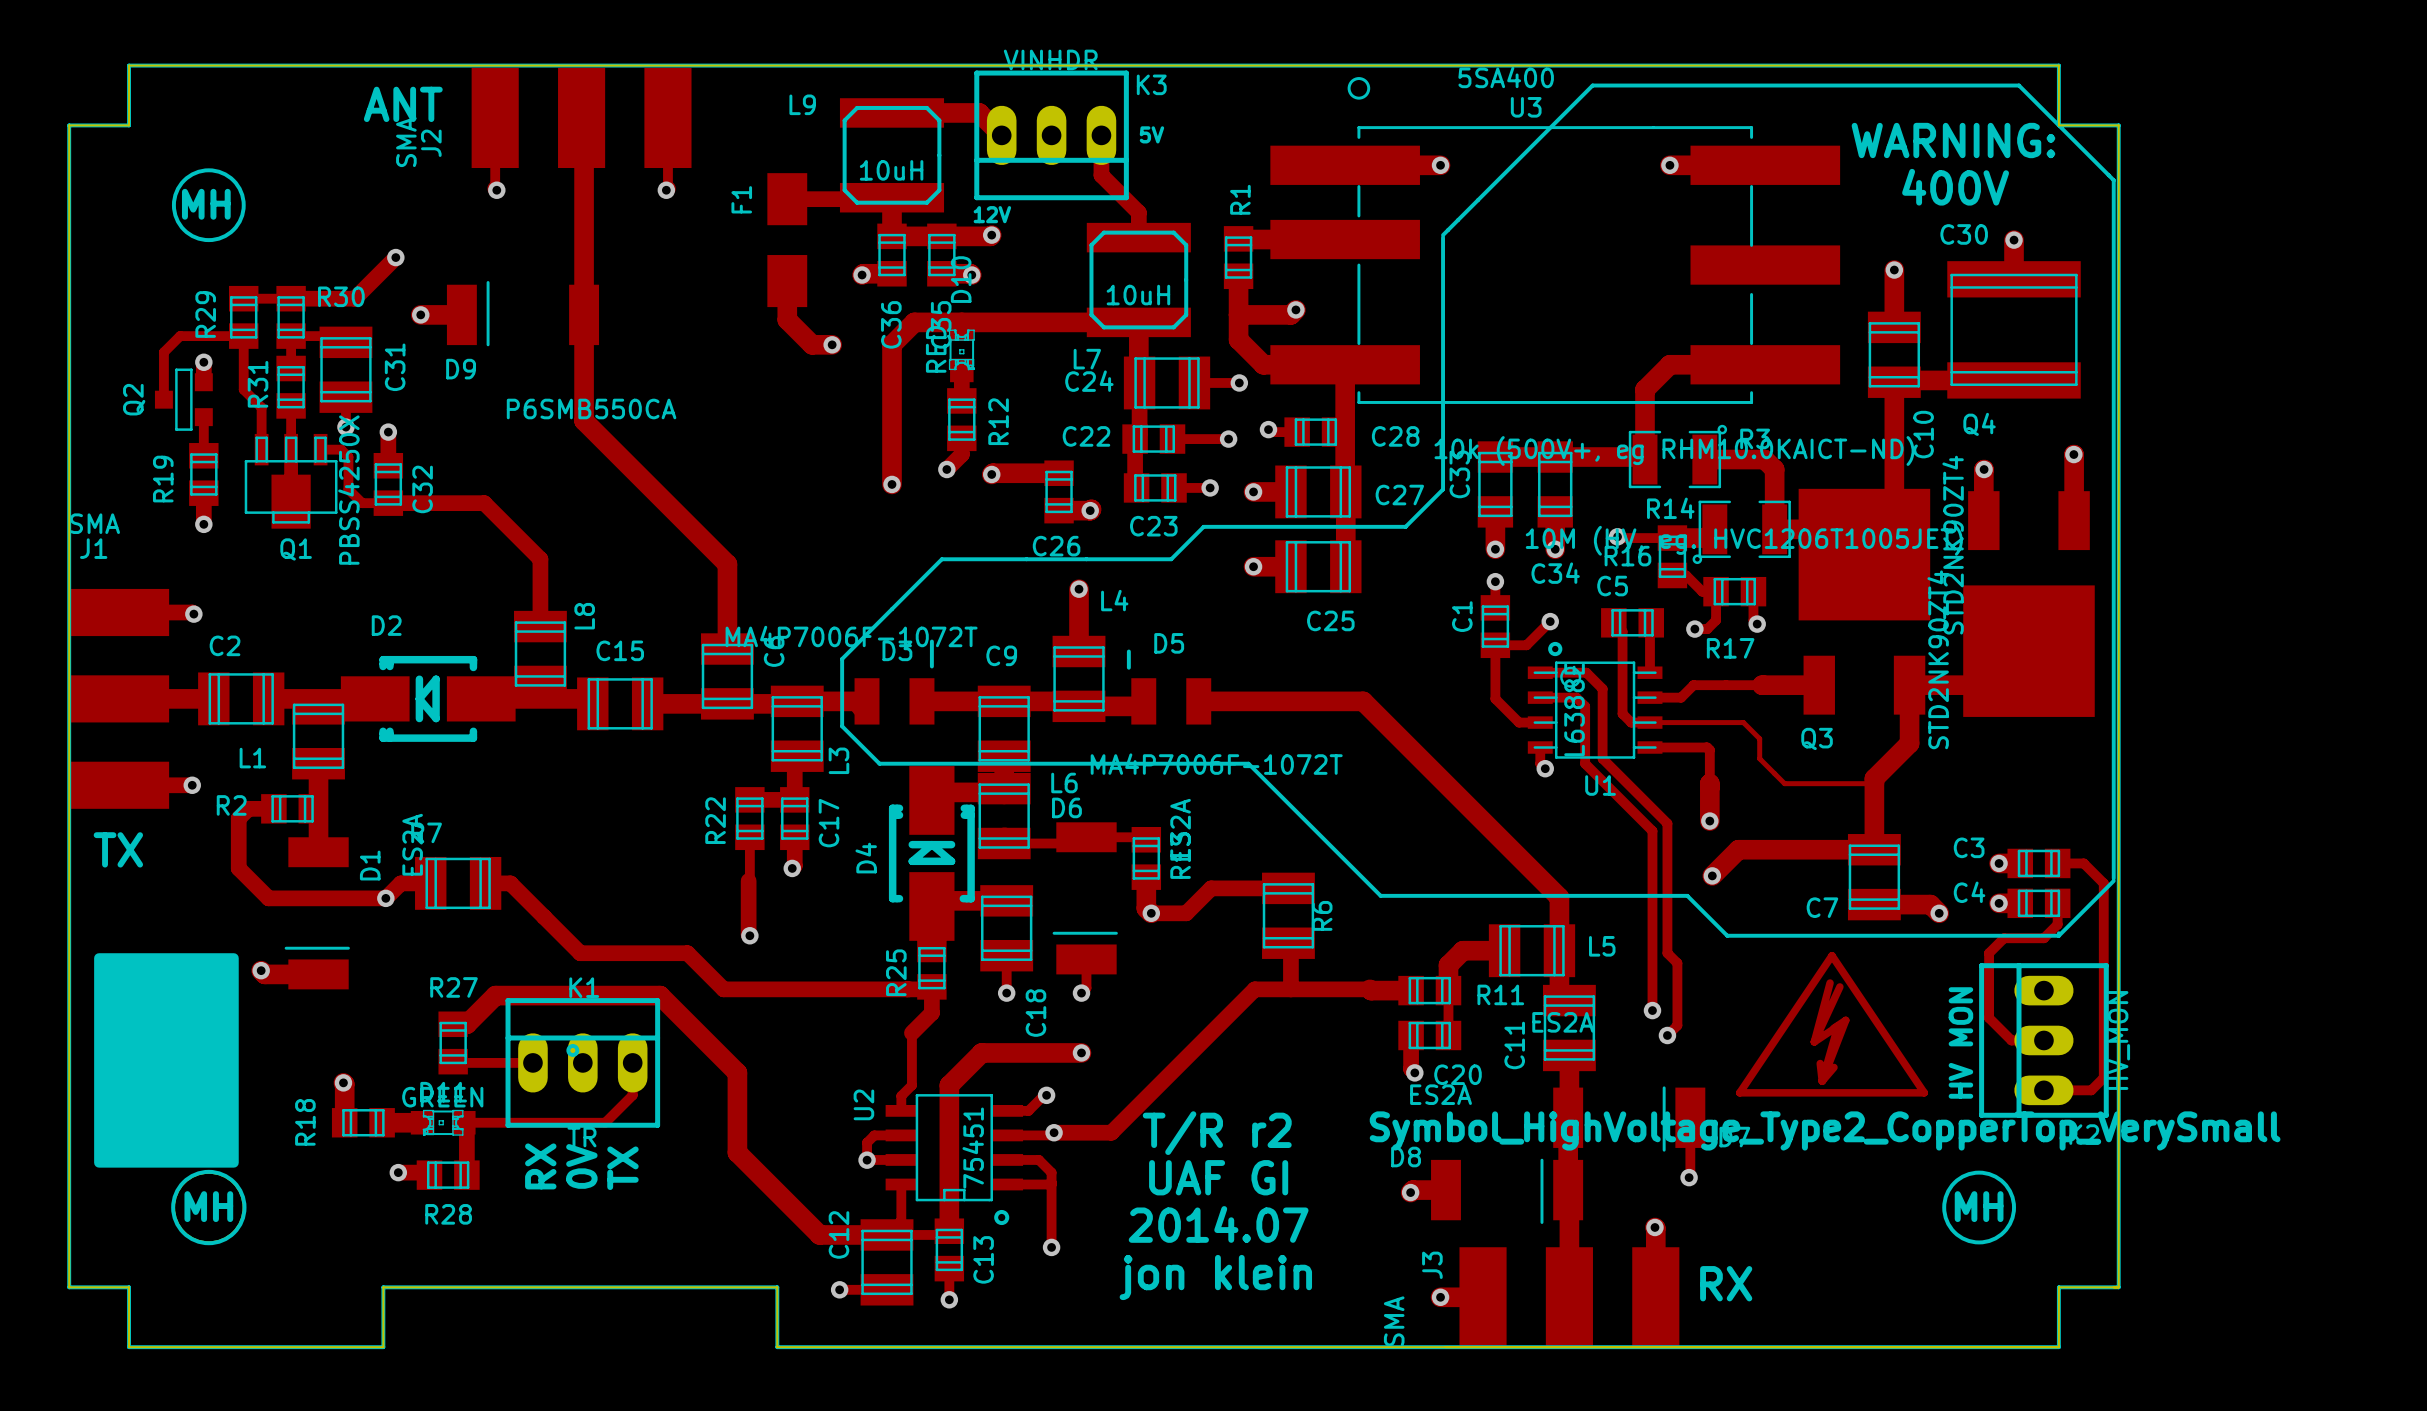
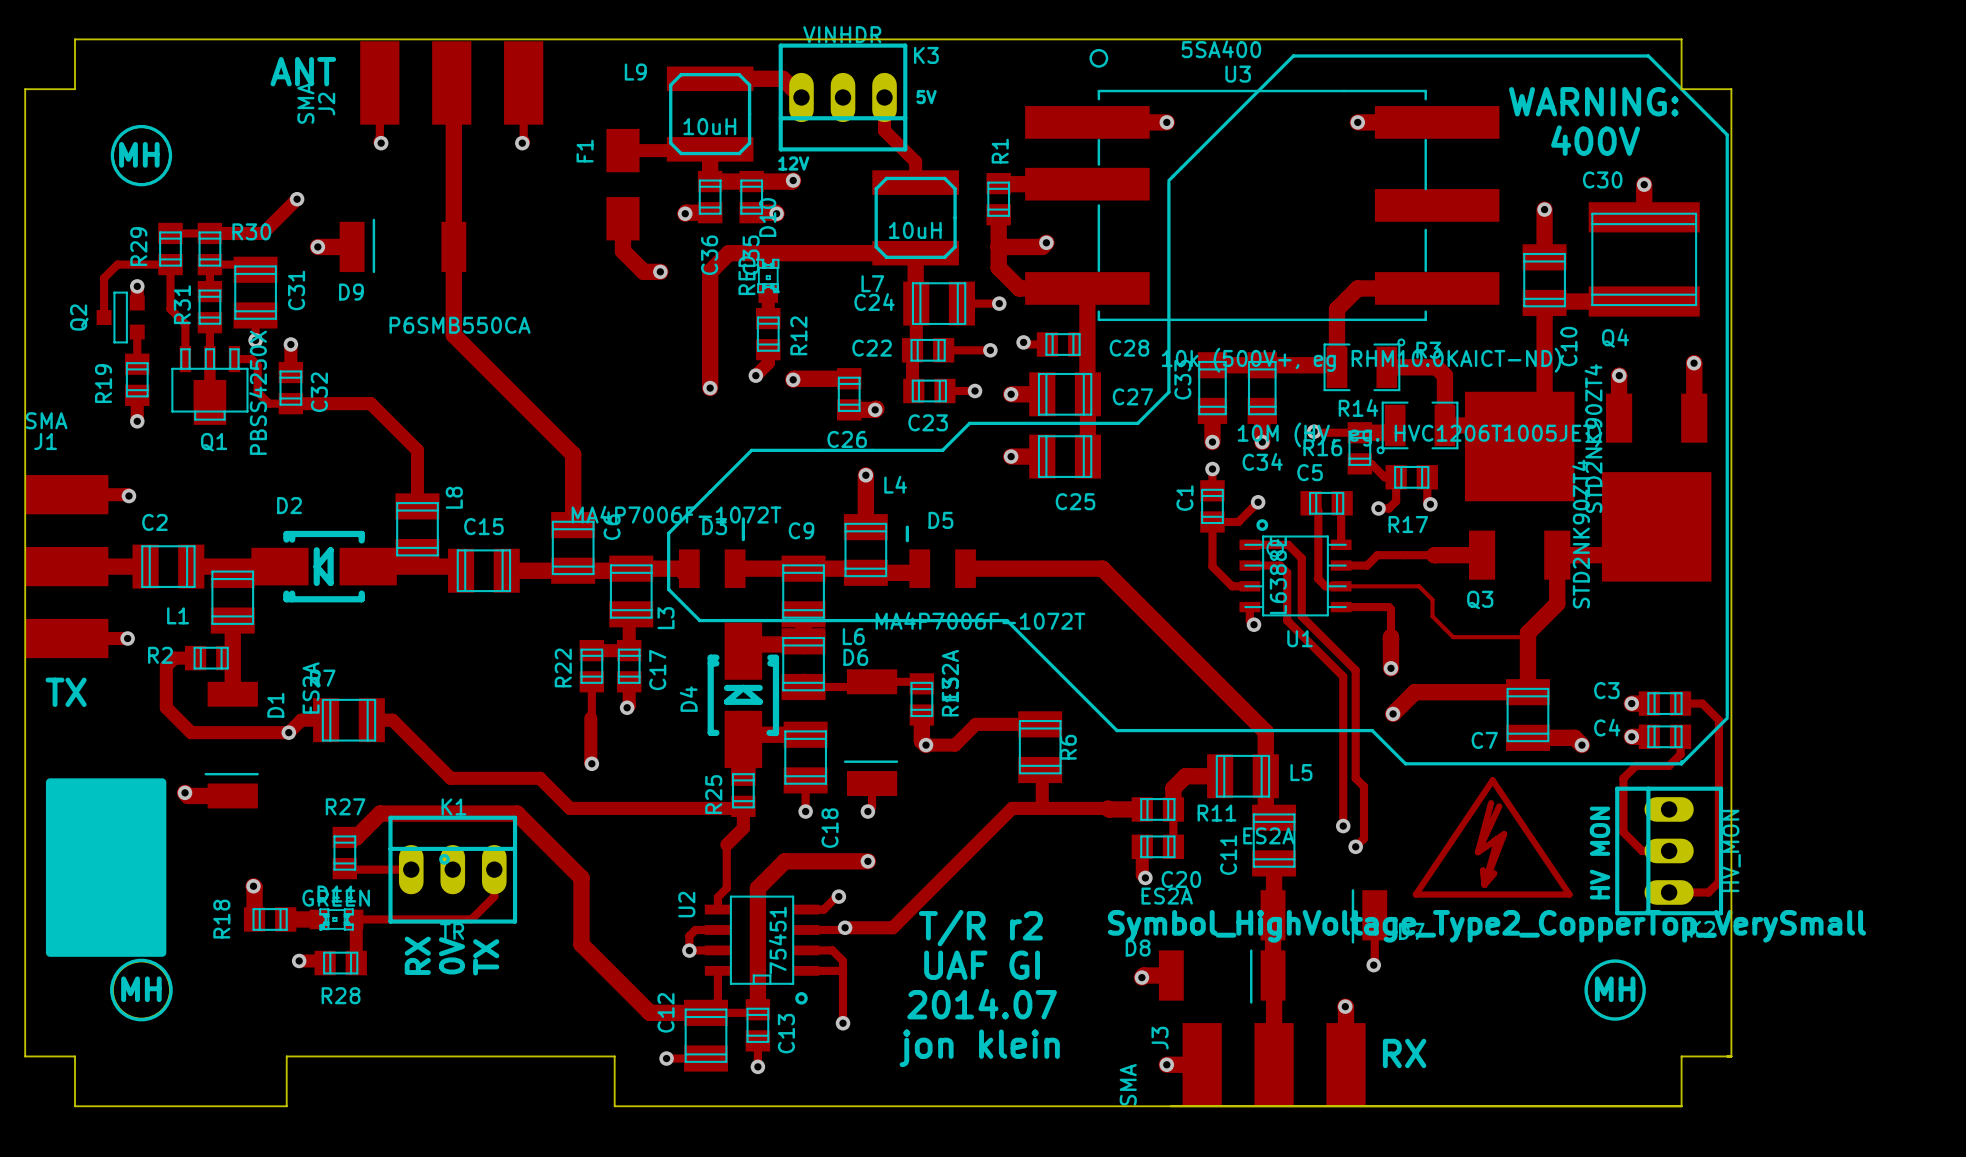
line: (129, 65) (129, 125) (69, 125) (69, 1287) (129, 1287) (129, 1347) (383, 1347) (383, 1287) (777, 1287) (777, 1347) (2058, 1347) (2058, 1287) (2118, 1287) (2118, 125) (2058, 125) (2058, 65) (129, 65) -> none

